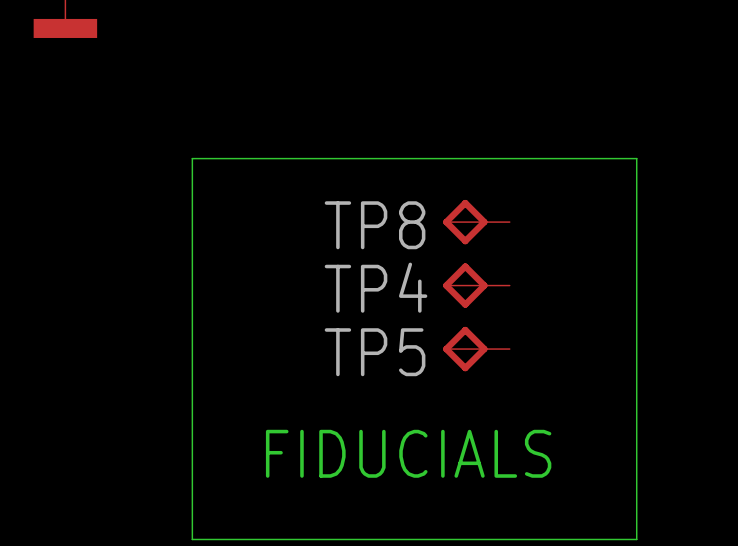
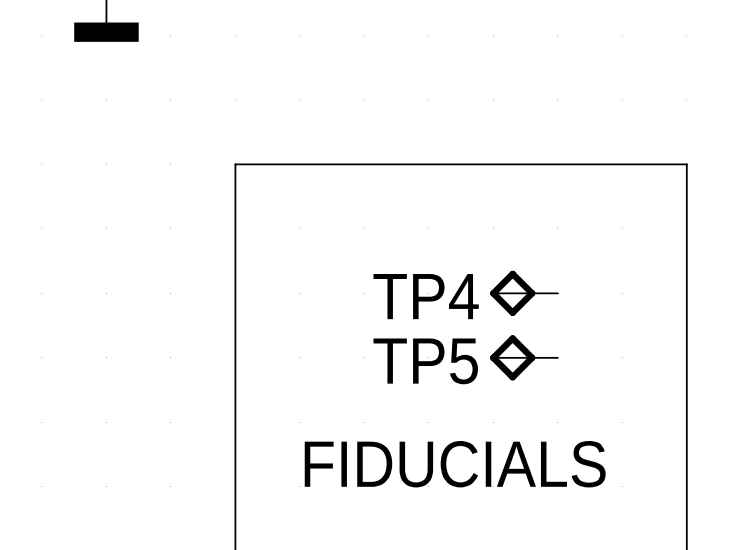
TP8: (476, 222) -> none

